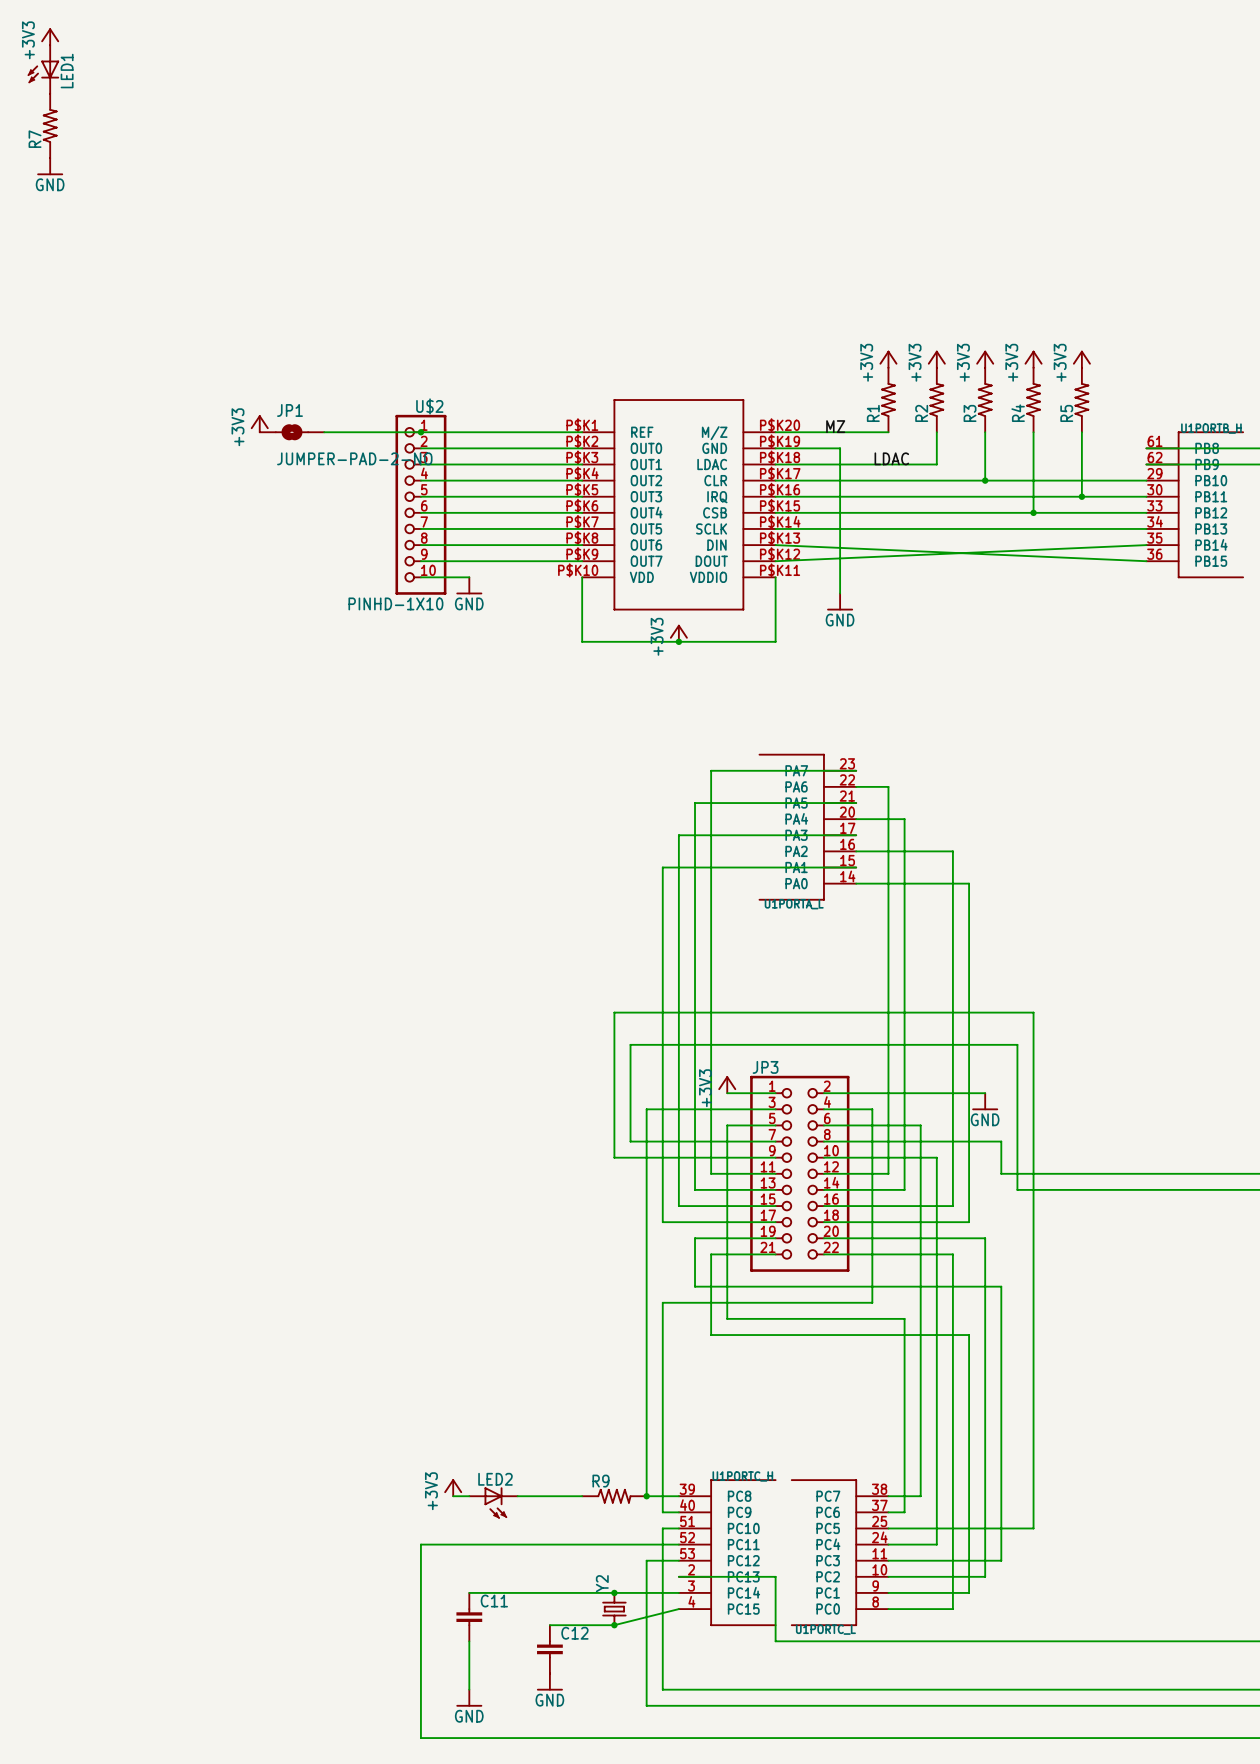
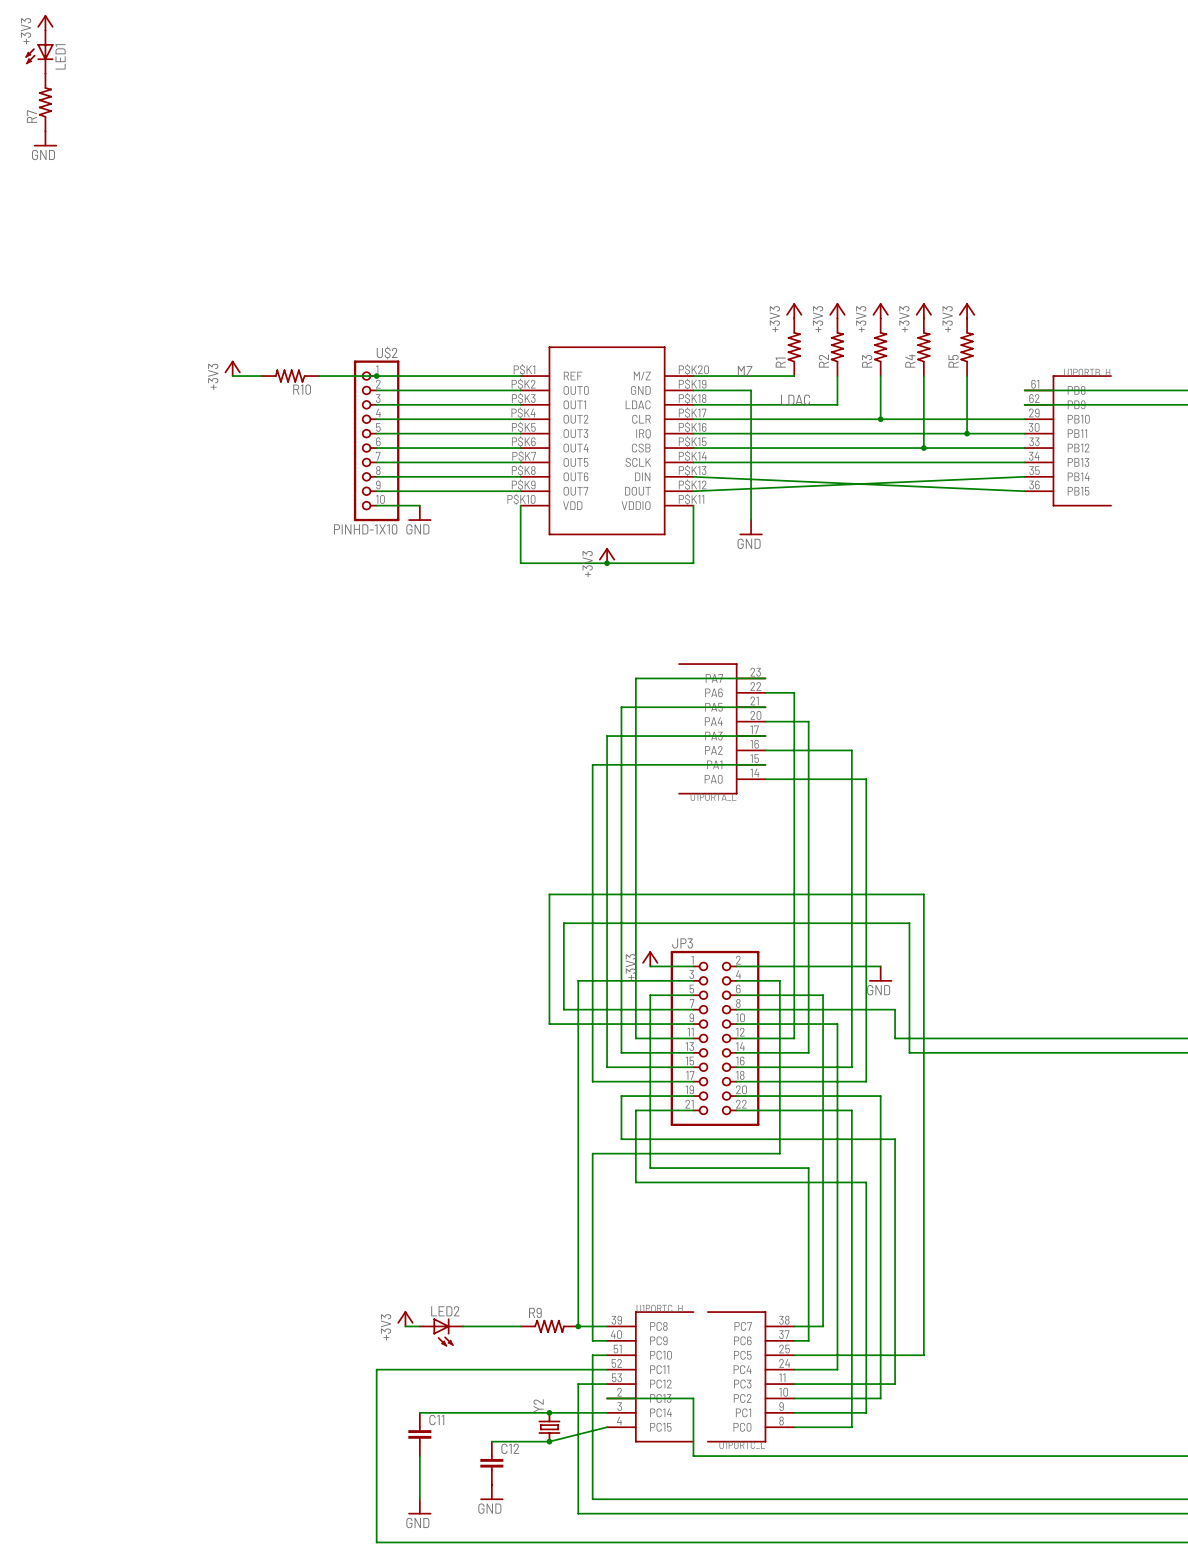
JP1: JUMPER-PAD-2-NO (291, 432) -> none
R10: none -> (290, 376)

